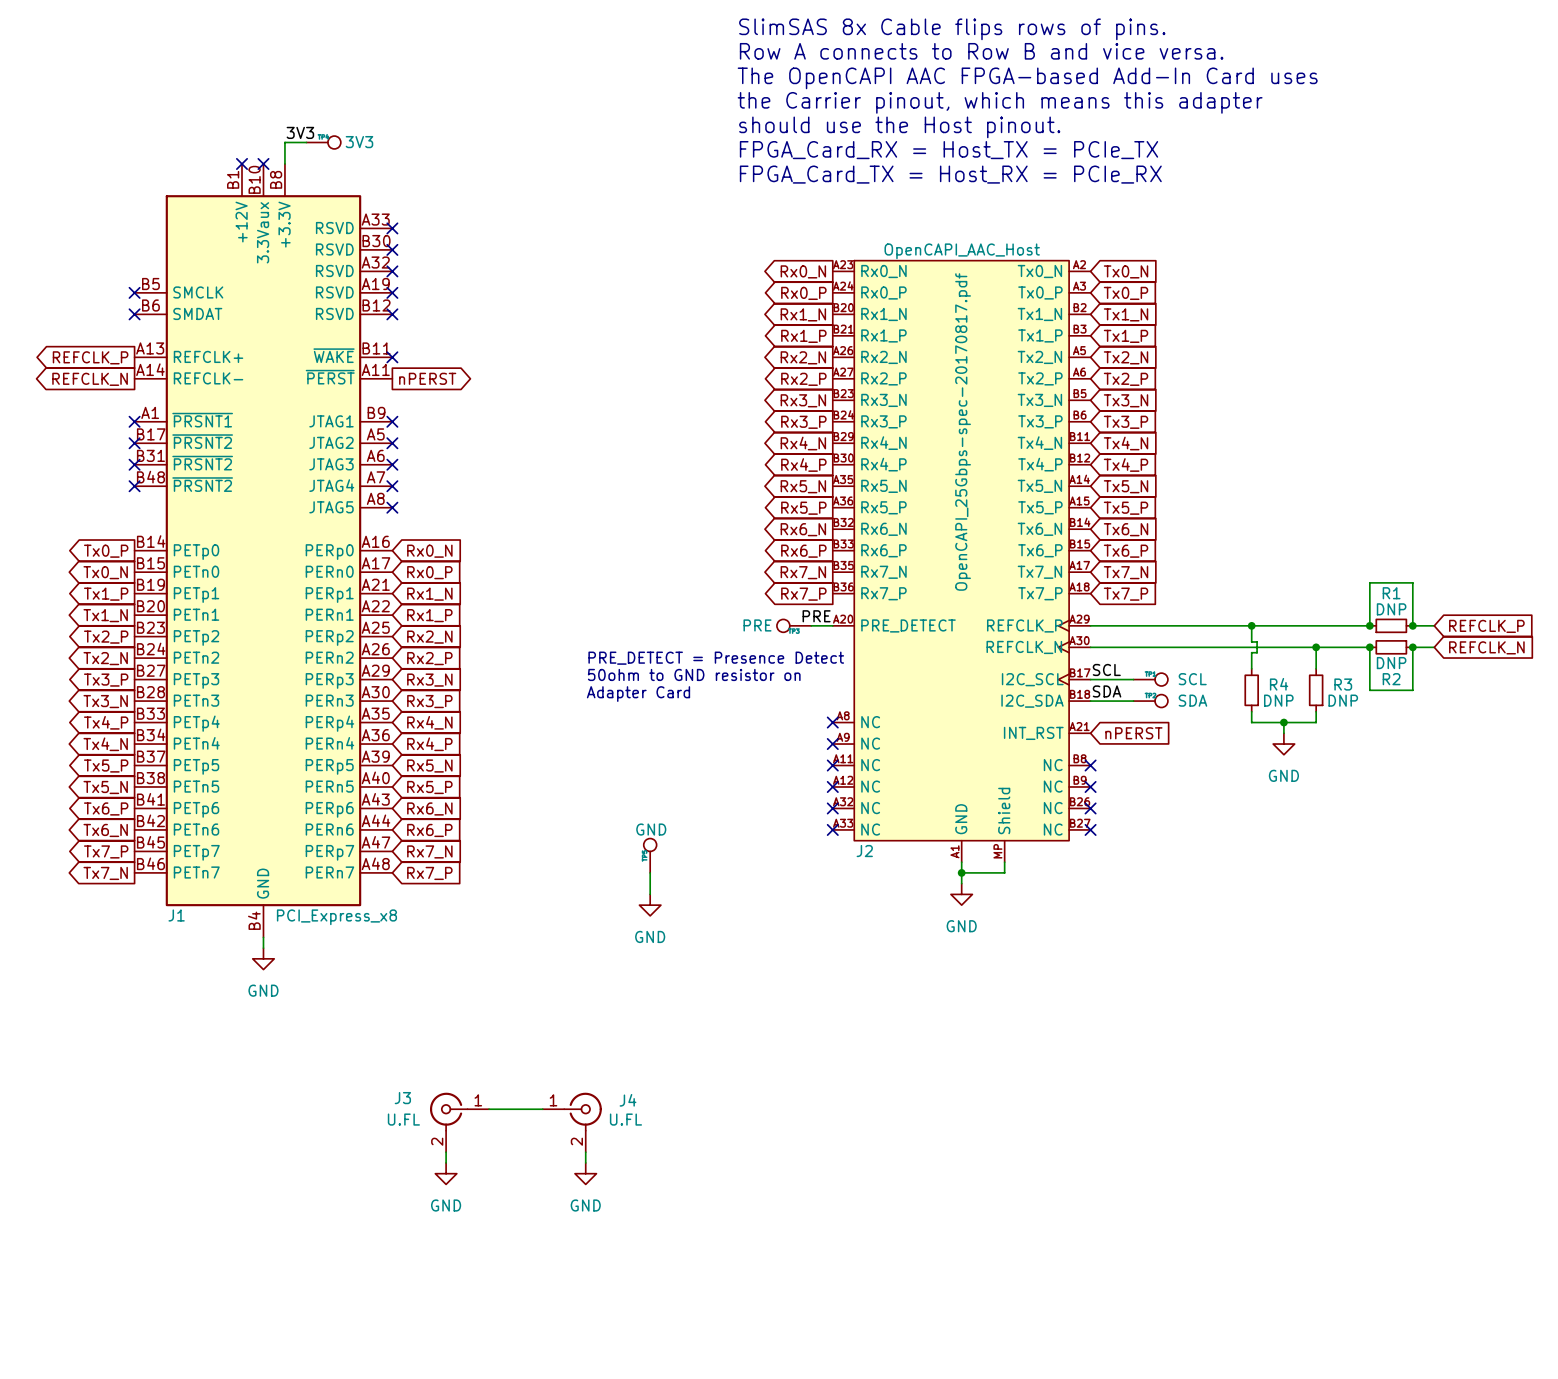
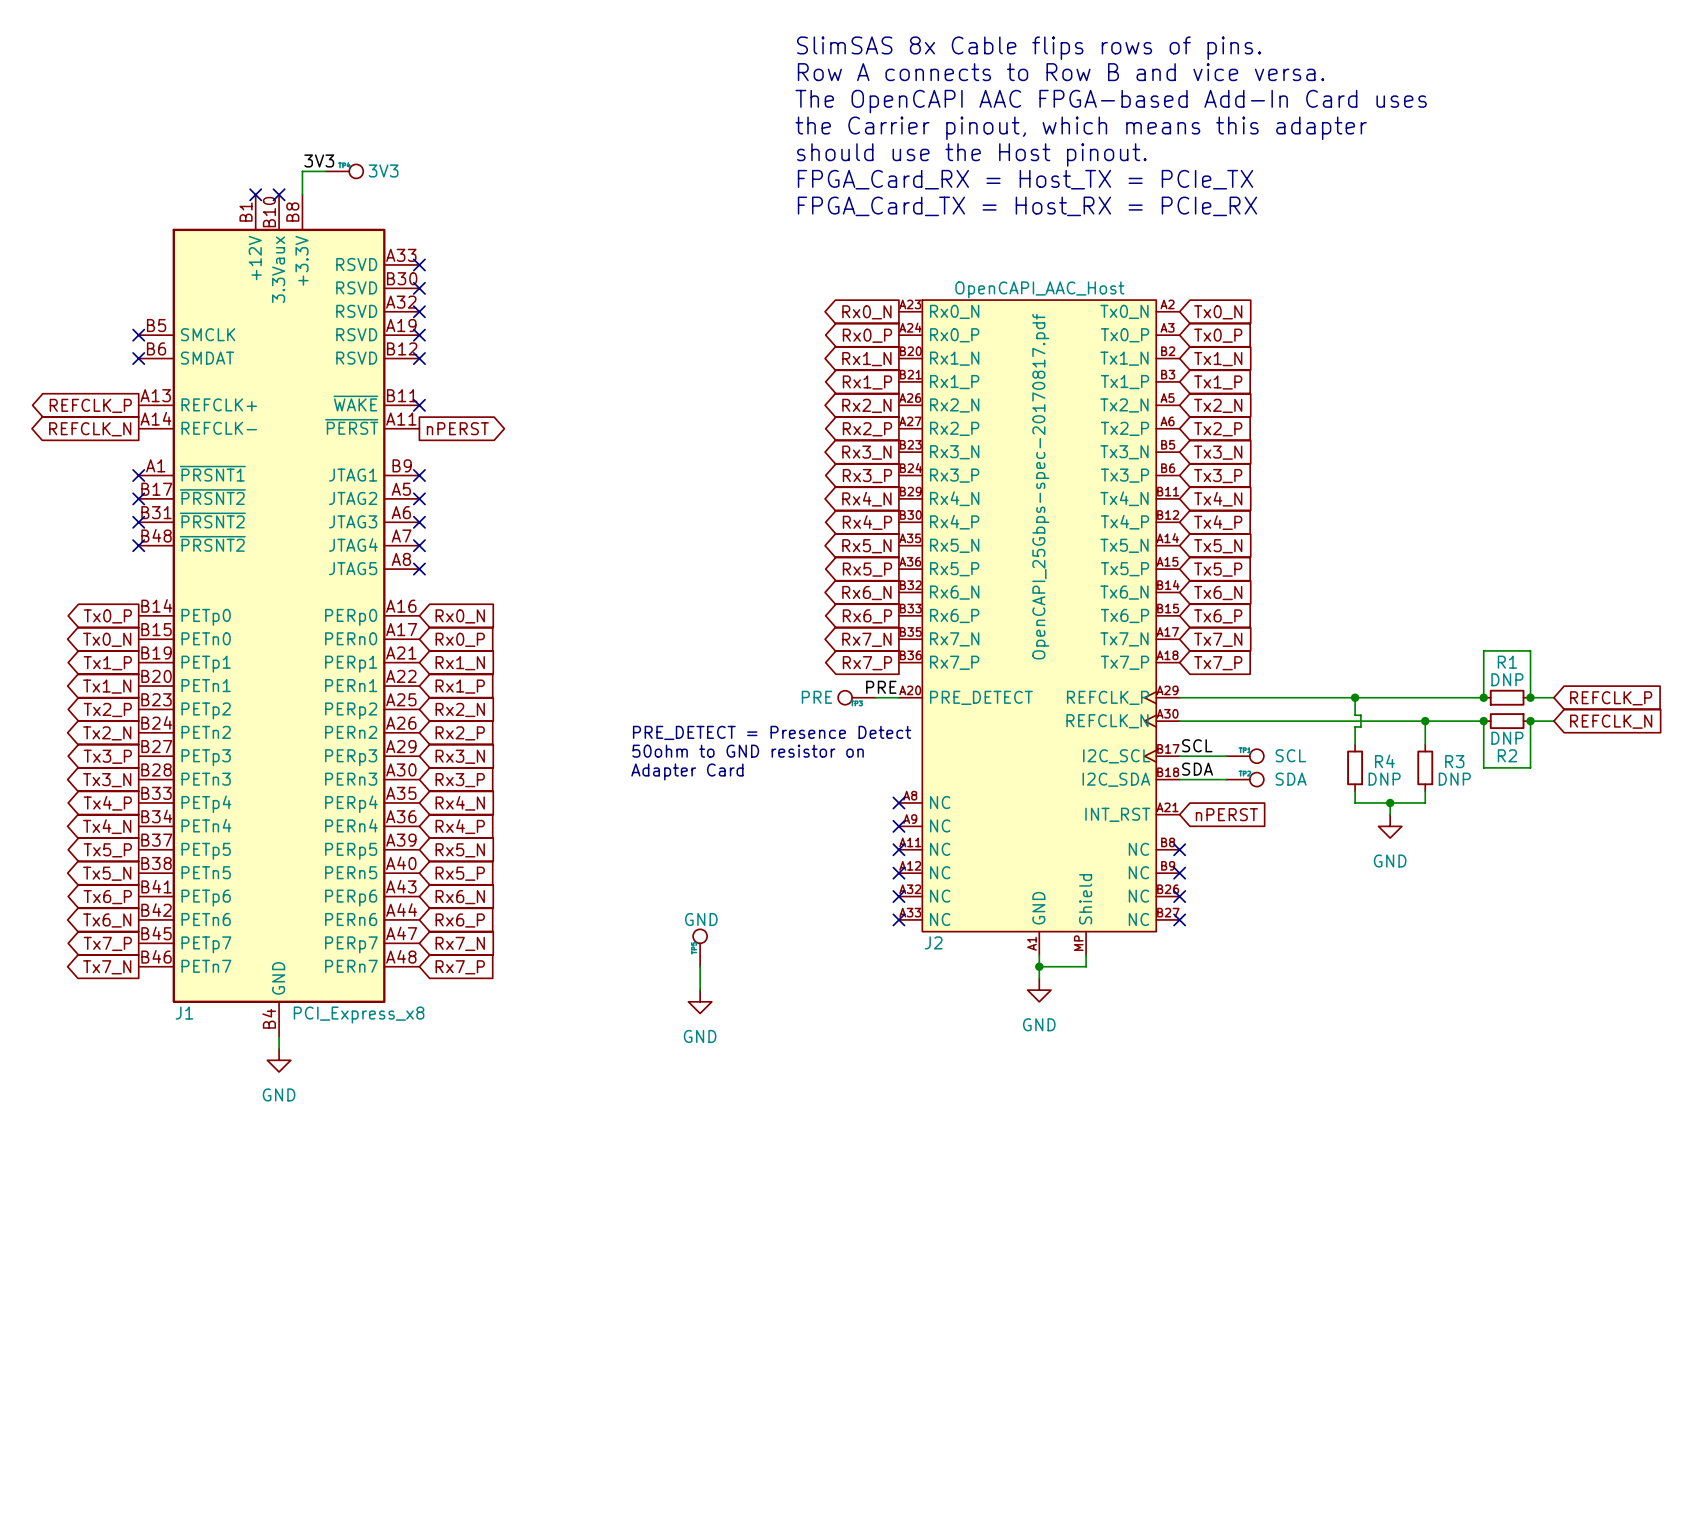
wire: (489, 1109) (542, 1109) -> none
J3: U.FL (459, 1122) -> none
J4: U.FL (572, 1122) -> none
wire: (446, 1152) (446, 1162) -> none
wire: (585, 1152) (585, 1162) -> none
power symbol: GND (446, 1173) -> none
power symbol: GND (585, 1173) -> none

